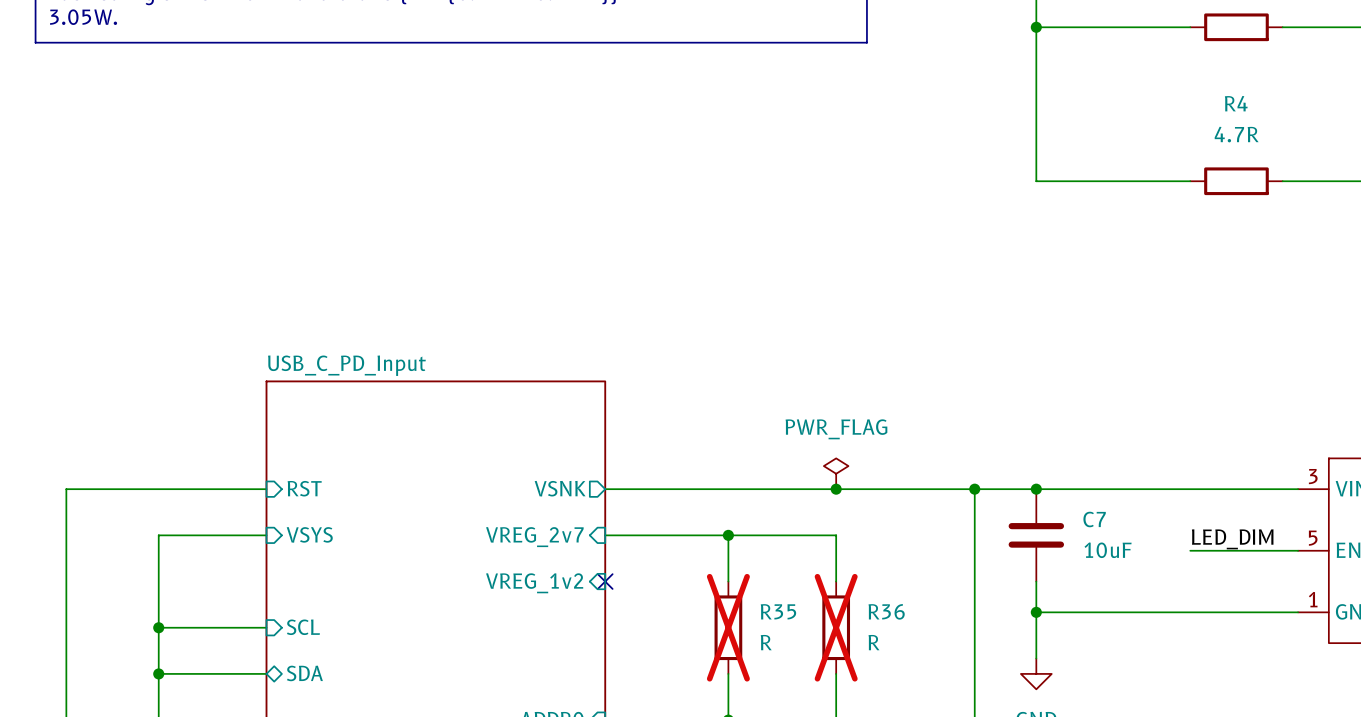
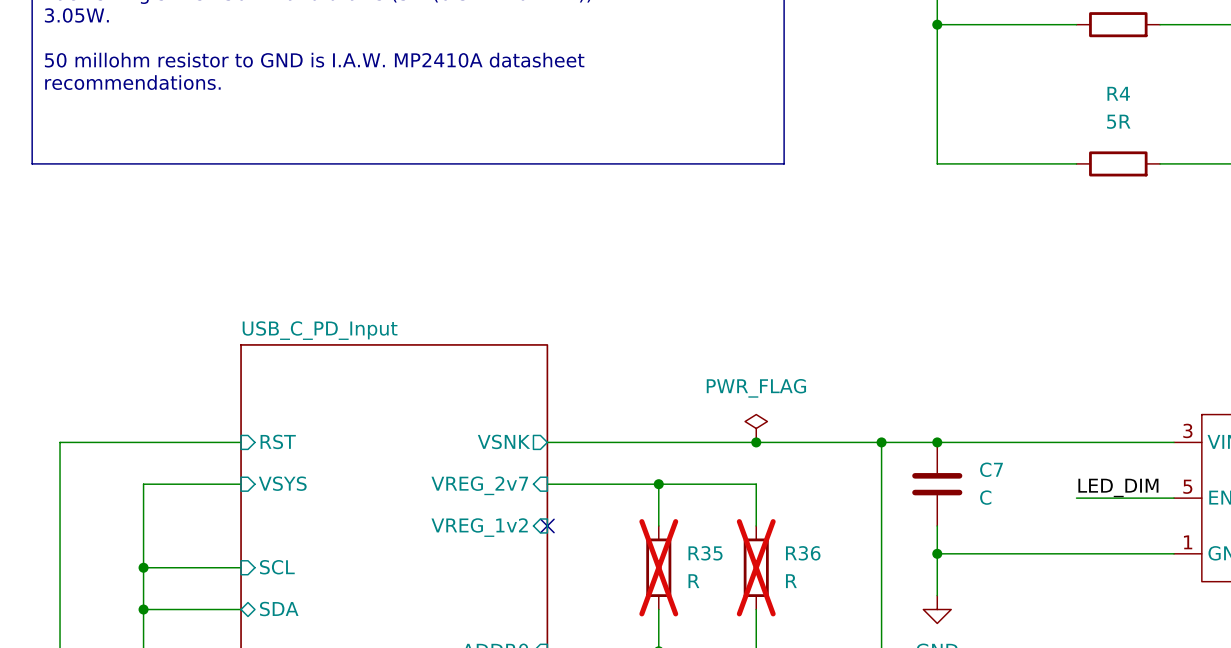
line: (35, 42) (866, 42) -> (32, 38) (32, 163) (784, 163) (784, 38)
text: none -> 50 millohm resistor to GND is I.A.W. MP2410A datasheet (314, 60)
text: none -> recommendations. (132, 82)
R4 value: 4.7R (1236, 134) -> 5R (1118, 121)
C7 value: 10uF (1108, 550) -> C (985, 497)

